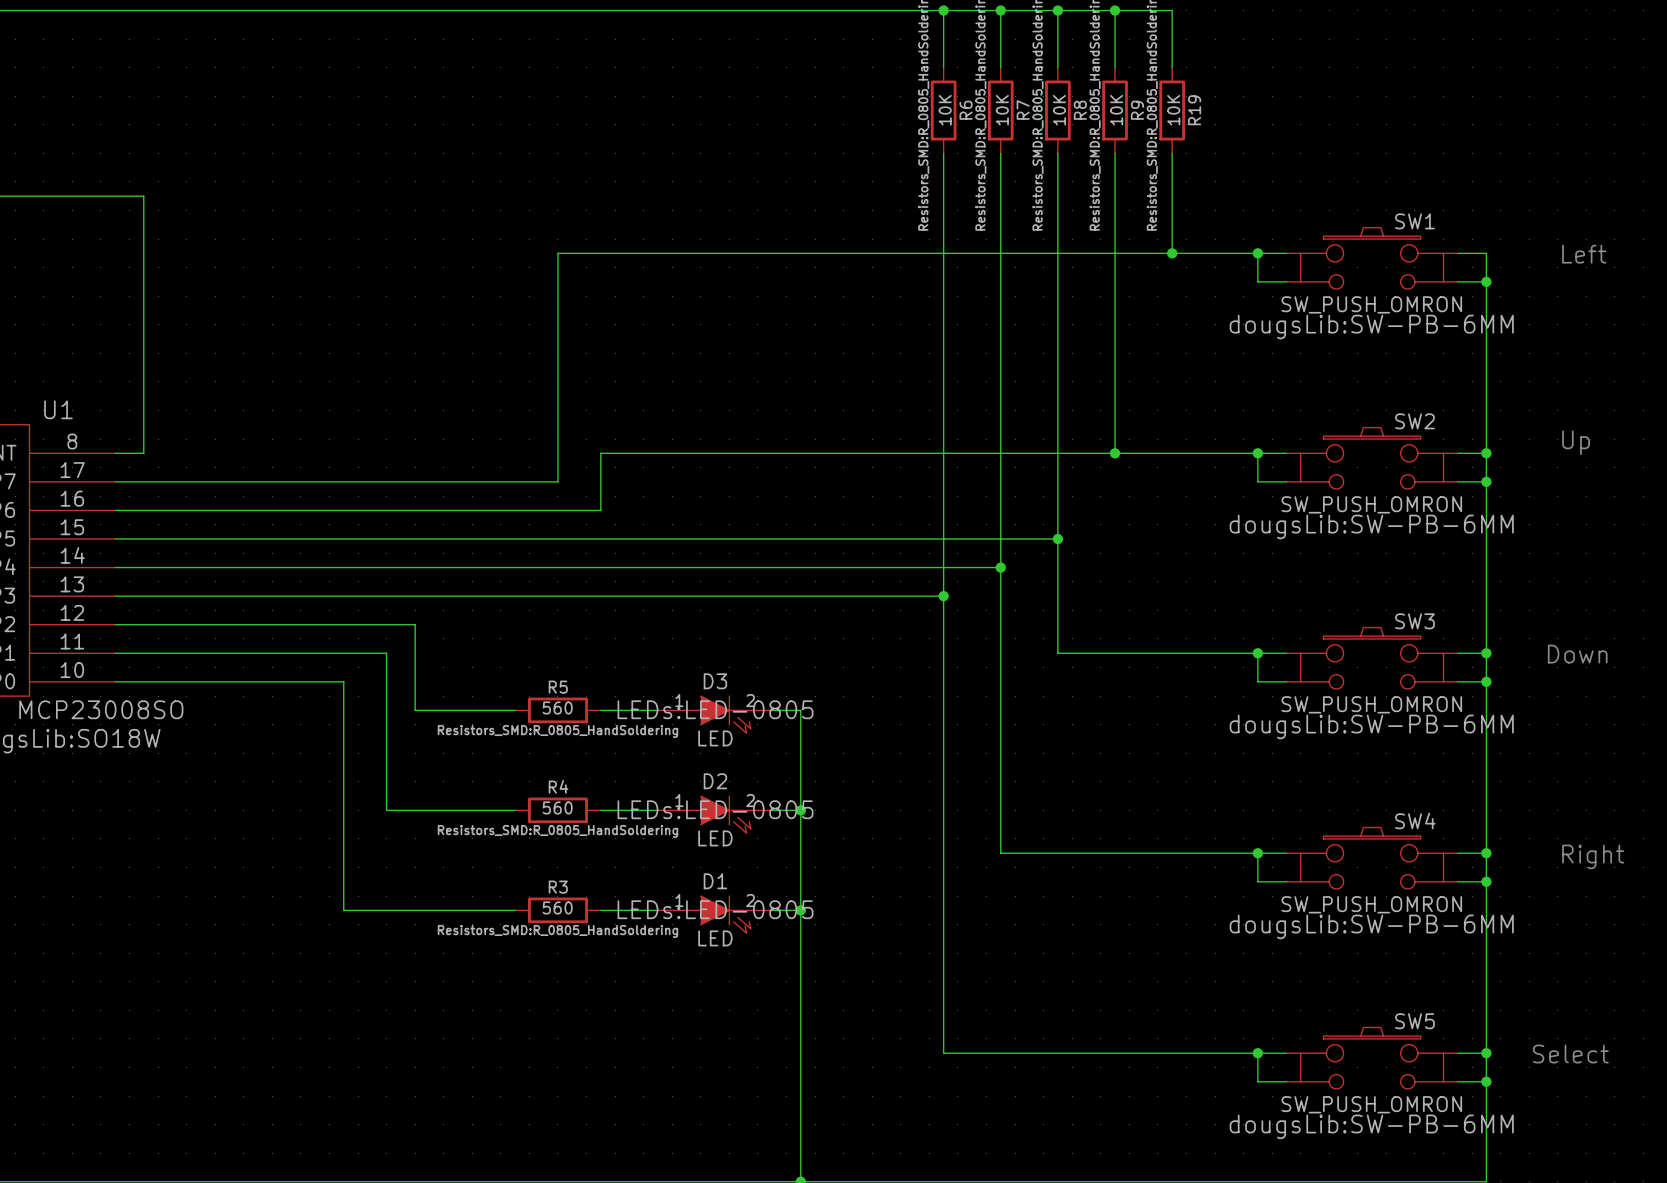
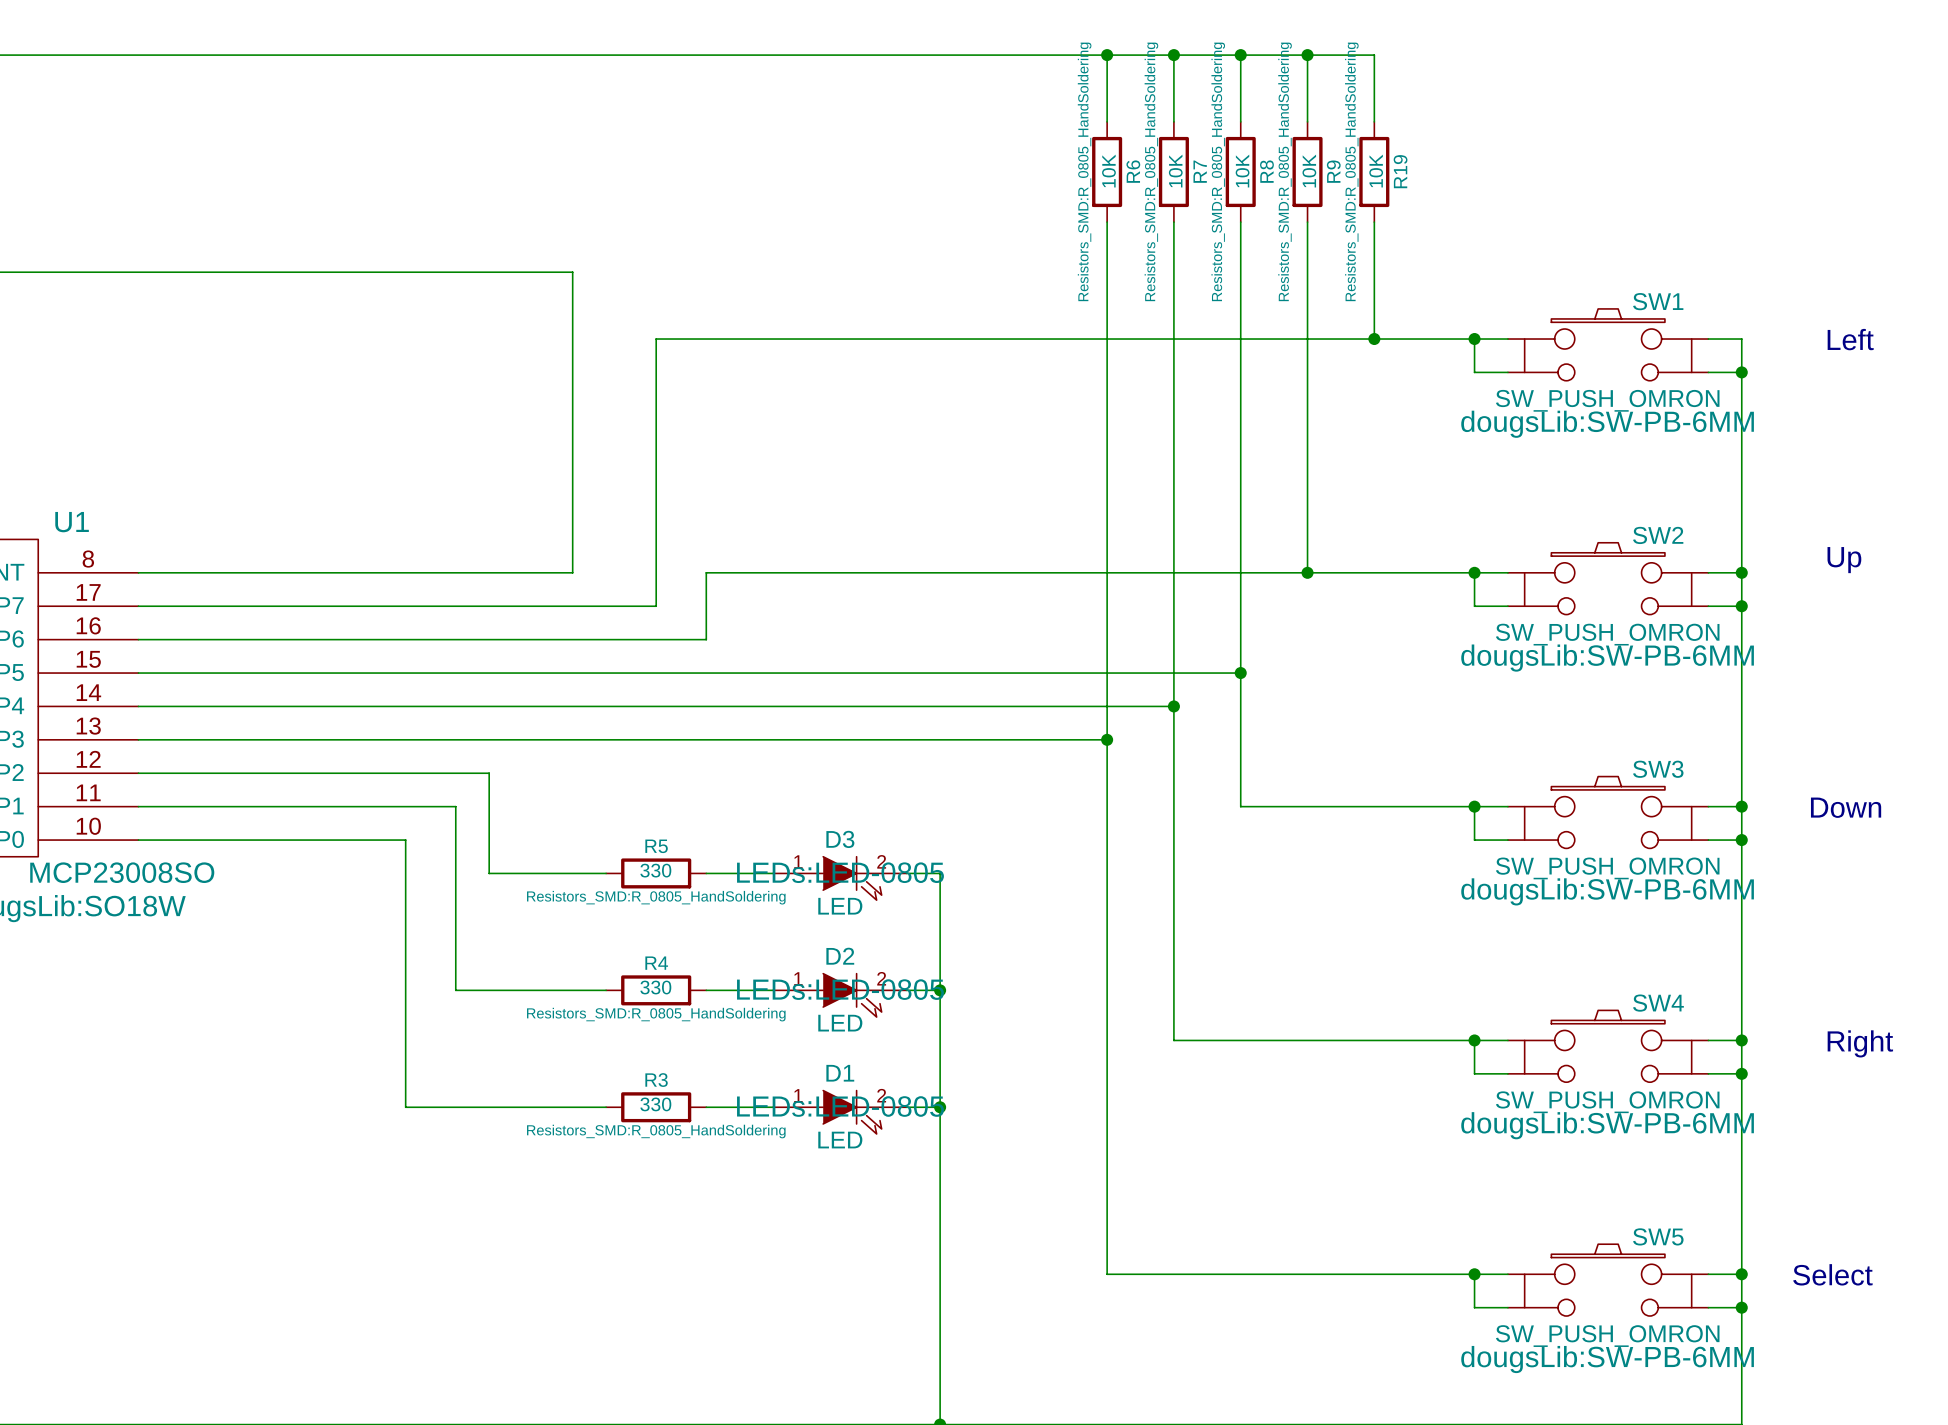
wire: (143, 196) (143, 453) -> (171, 272) (572, 272) (572, 572) (171, 572)
R5 value: 560 (557, 707) -> 330 (655, 870)
R4 value: 560 (557, 807) -> 330 (655, 987)
R3 value: 560 (557, 907) -> 330 (655, 1104)

